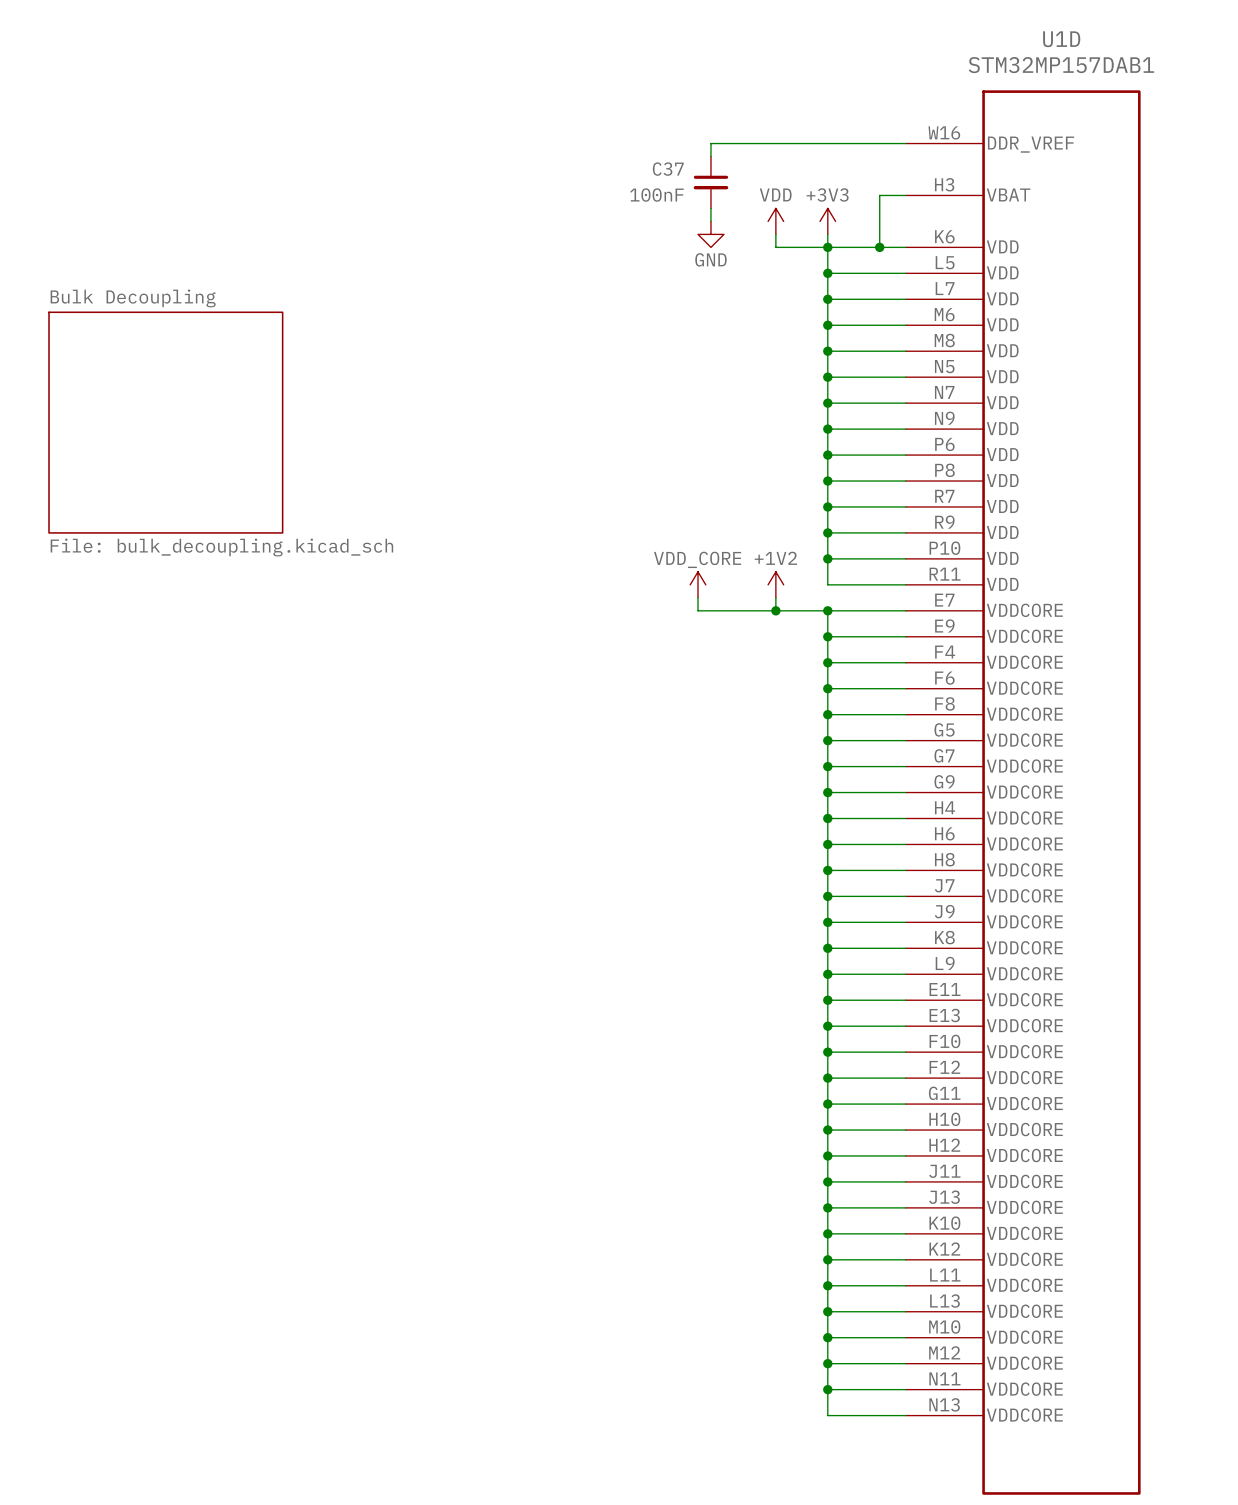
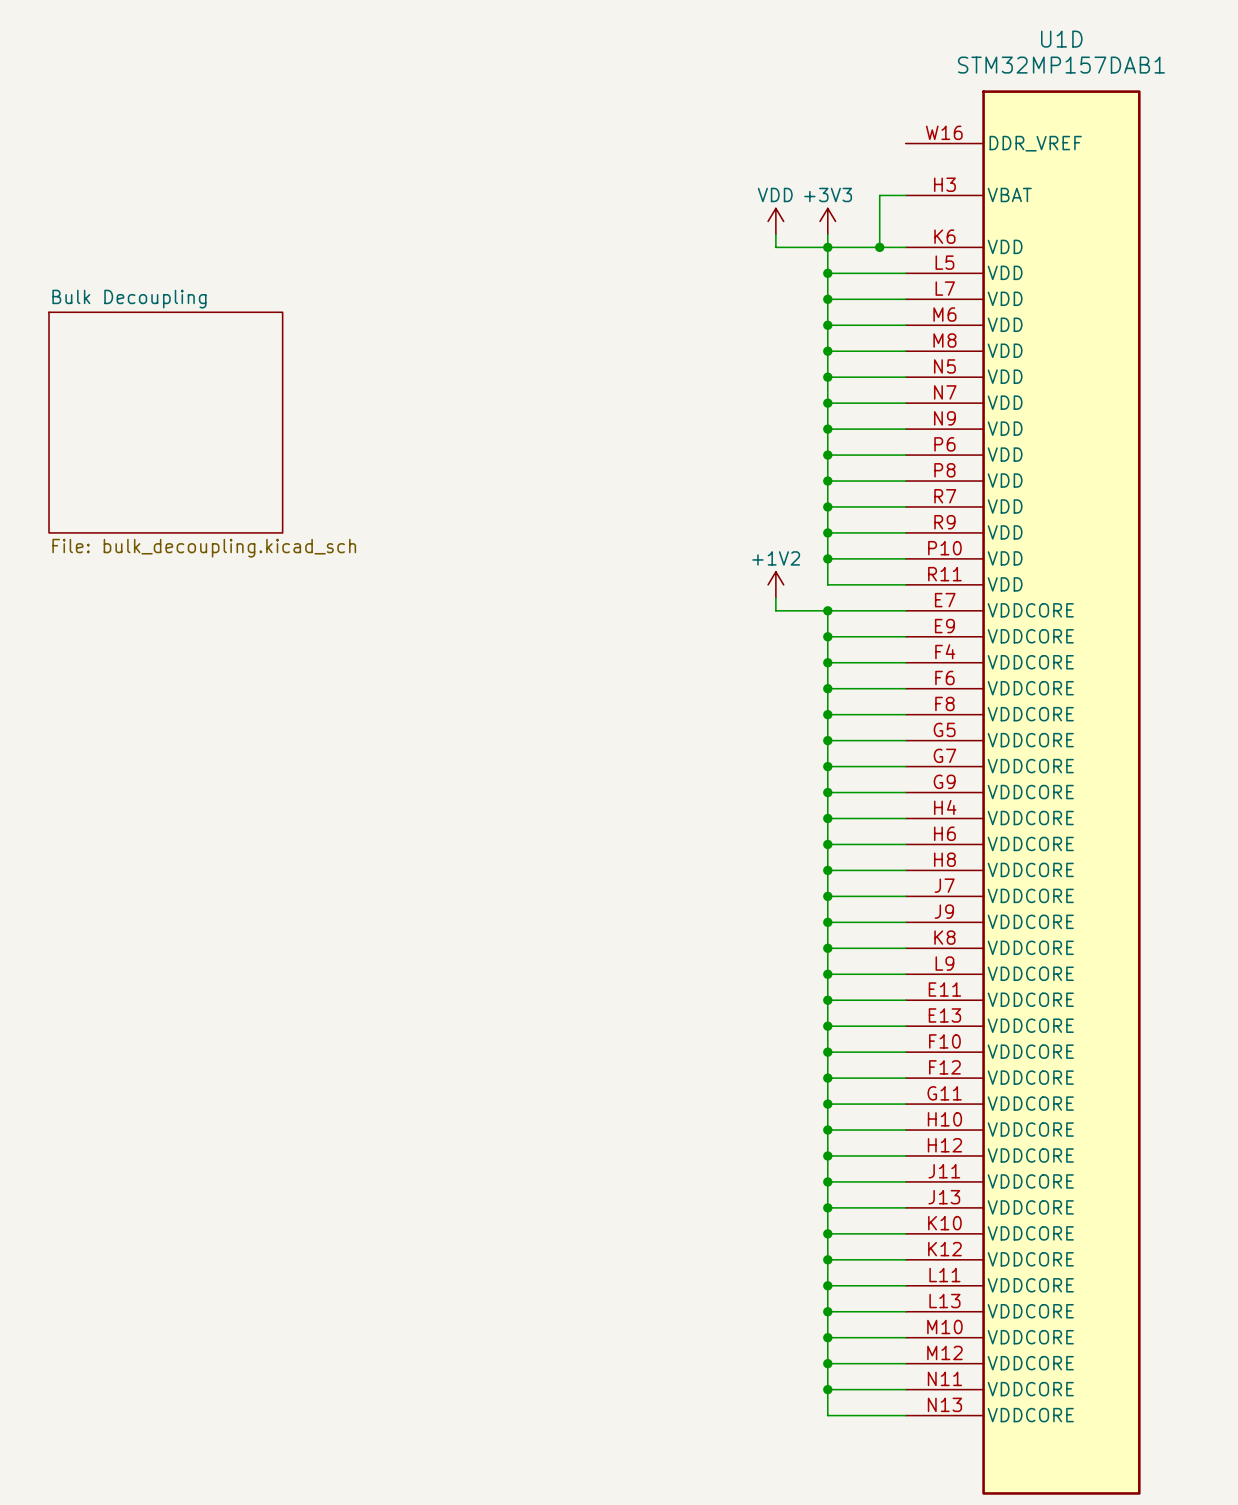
wire: (905, 143) (710, 143) (710, 156) -> none
C37: 100nF (710, 182) -> none
wire: (710, 208) (710, 221) -> none
power symbol: GND (710, 234) -> none
power symbol: VDD_CORE (698, 584) -> none
wire: (698, 597) (698, 610) (775, 610) -> none
junction: (775, 610) -> none

